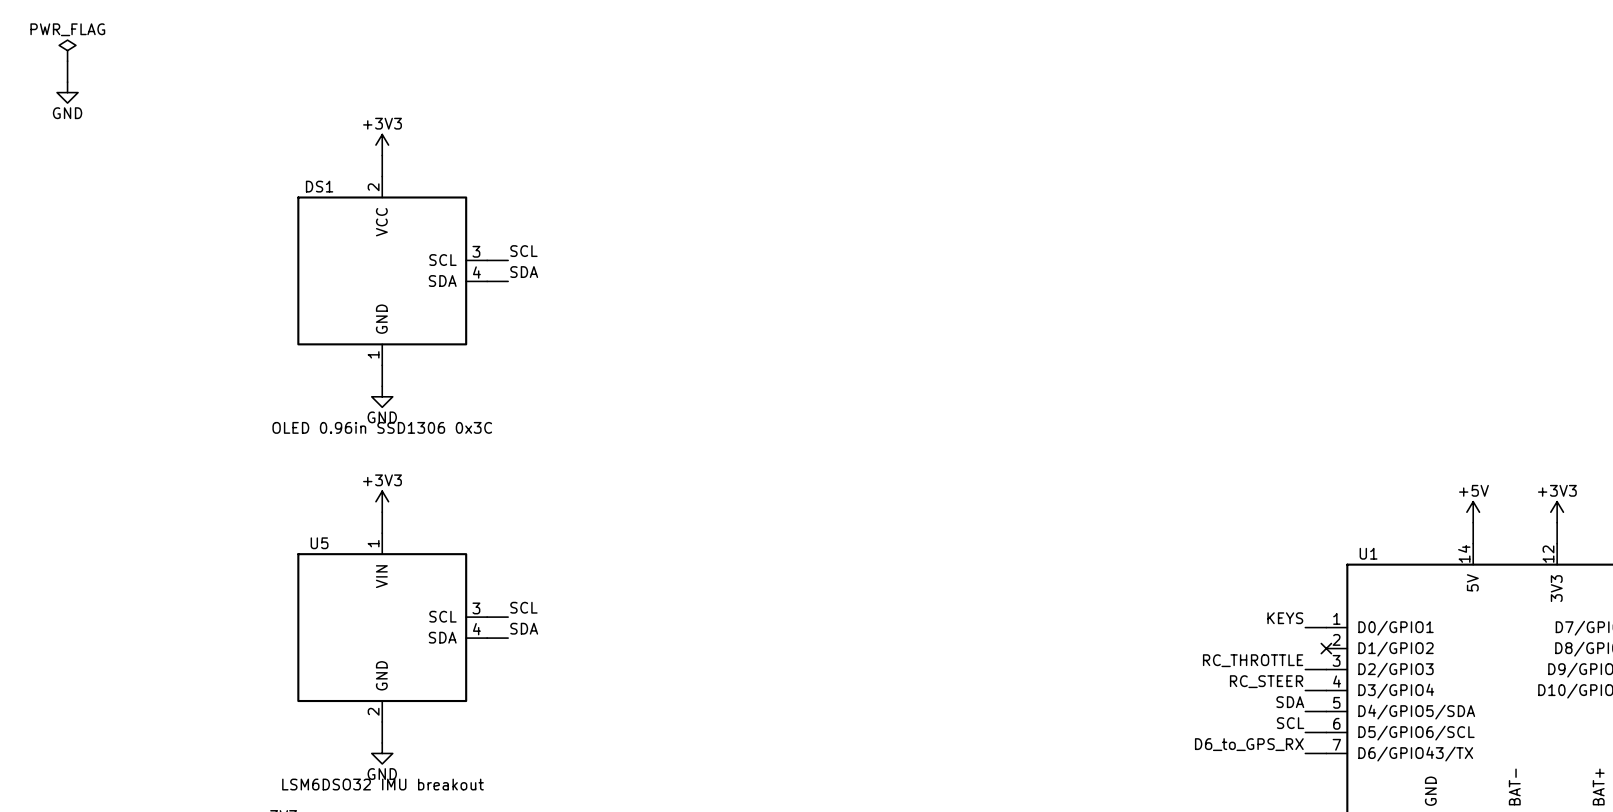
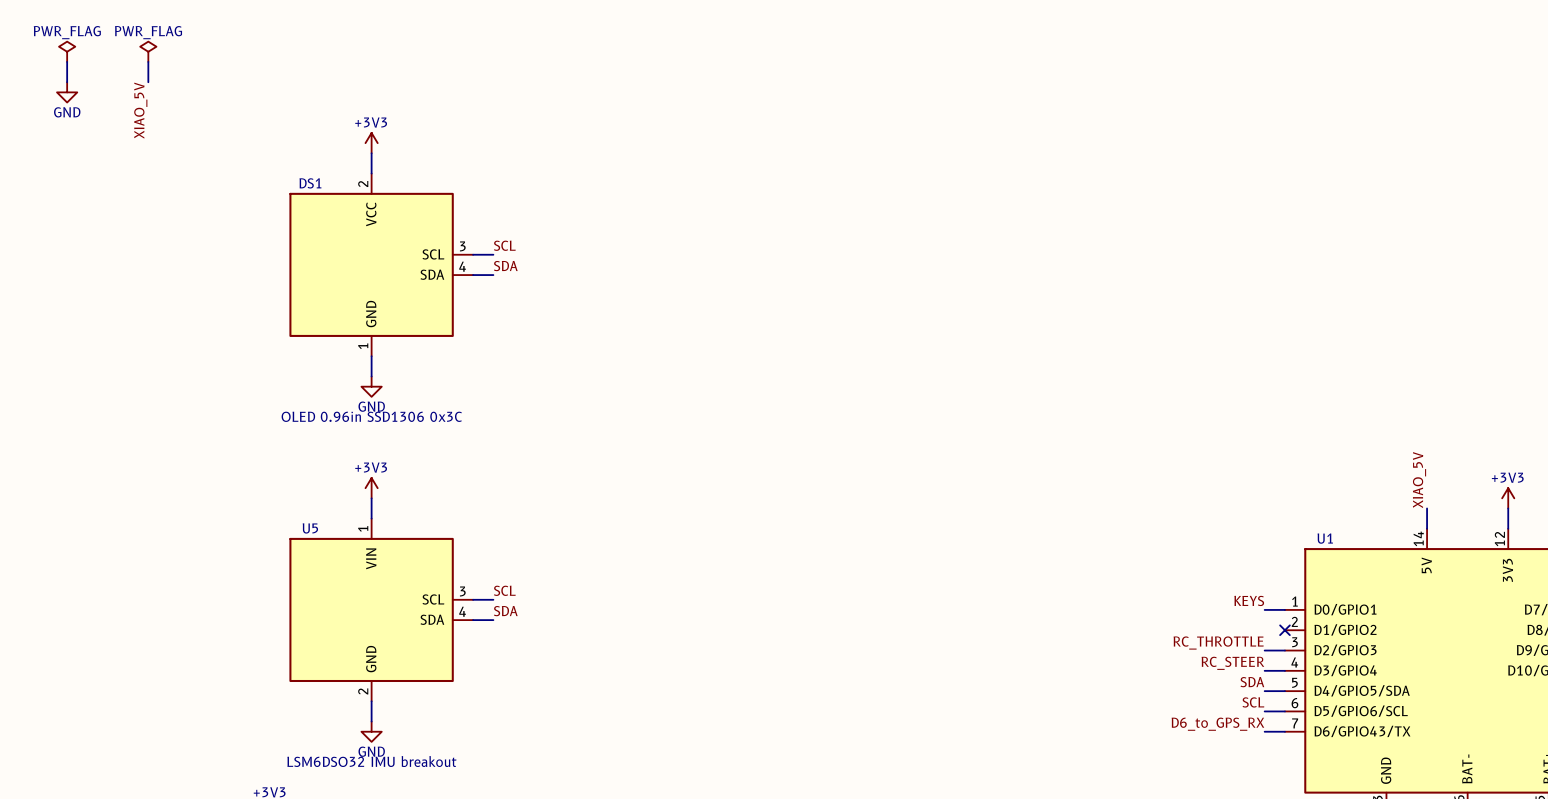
power symbol: none -> PWR_FLAG (148, 51)
wire: none -> (148, 61) (148, 82)
label: none -> XIAO_5V (140, 110)
label: none -> XIAO_5V (1419, 480)
power symbol: +5V (1473, 512) -> none

